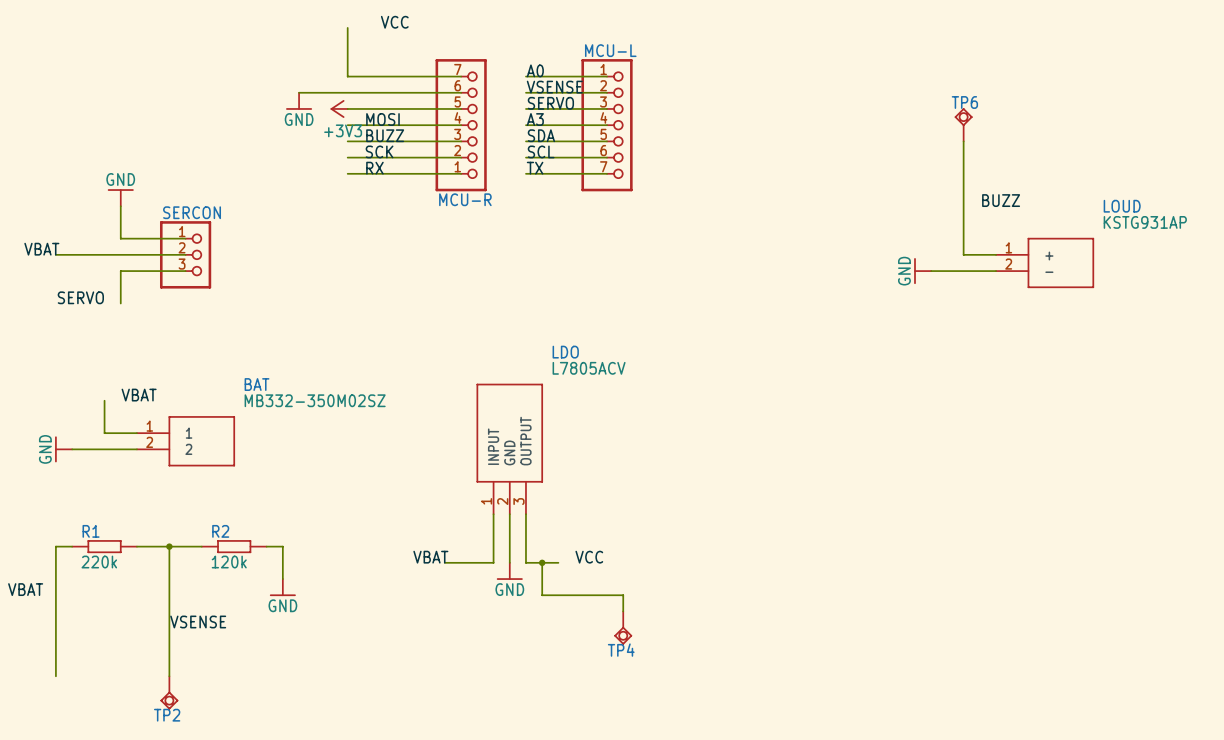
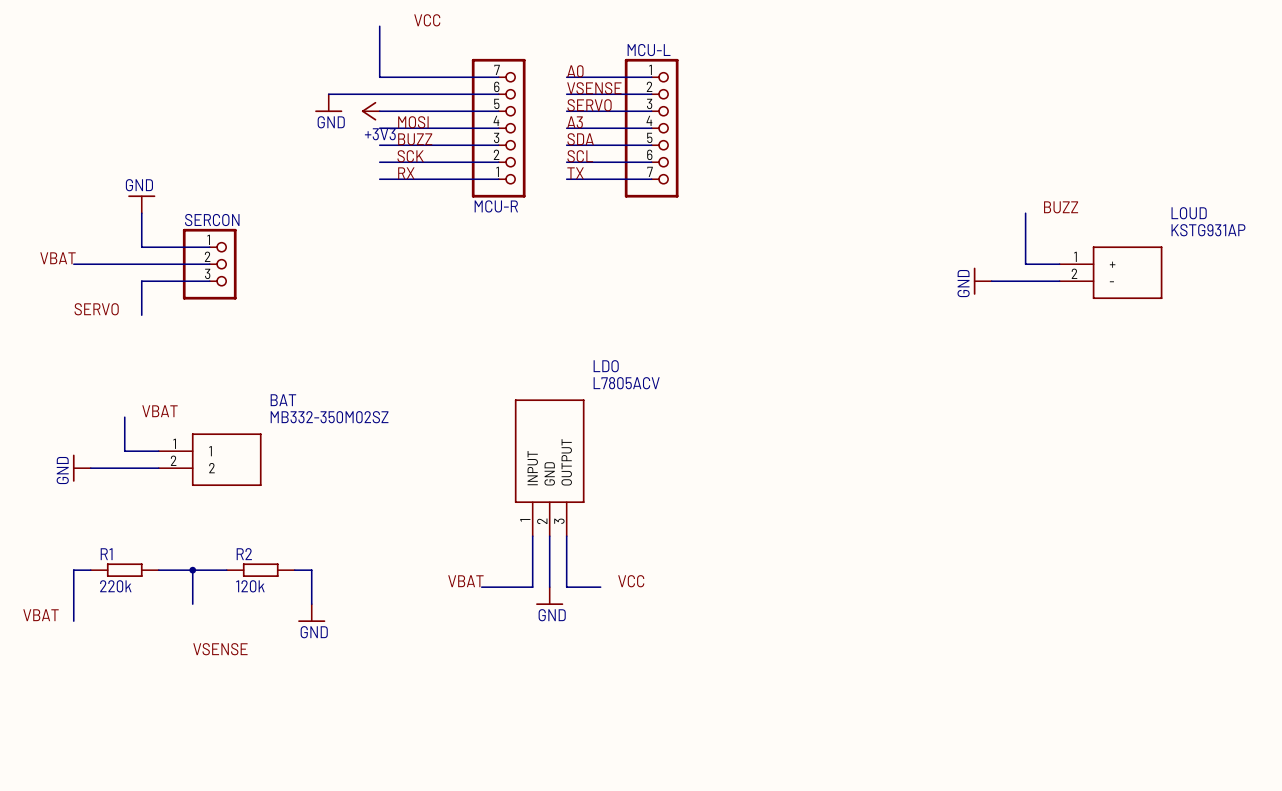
TP6: (963, 124) -> none
wire: (963, 141) (963, 206) -> none
wire: (542, 562) (542, 595) (623, 595) (623, 611) -> none
junction: (542, 562) -> none
wire: (169, 579) (169, 676) -> none
wire: (55, 595) (55, 676) -> none
TP4: (623, 627) -> none
TP2: (169, 692) -> none

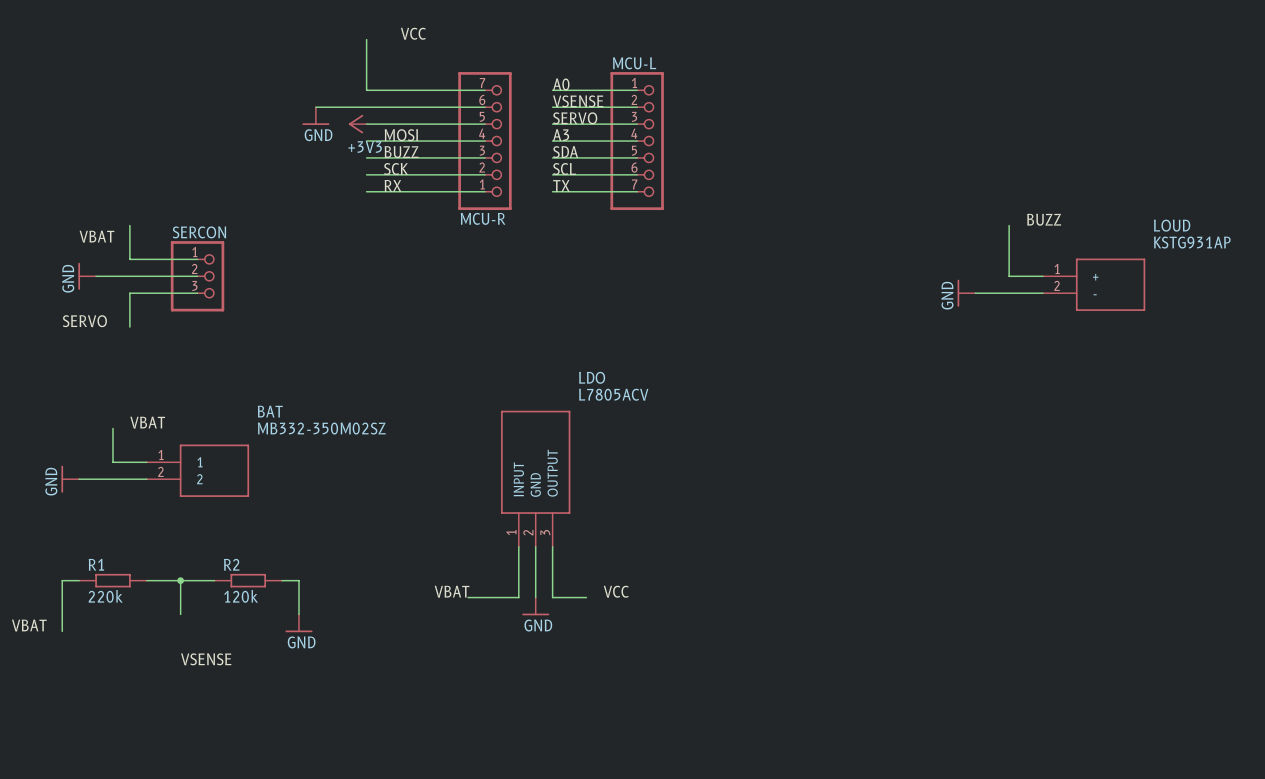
power symbol rotation: 0° (141, 196) -> 90° counterclockwise (79, 276)
power symbol position: GND (141, 204) -> GND (87, 276)
label position: VBAT (58, 258) -> VBAT (96, 236)

